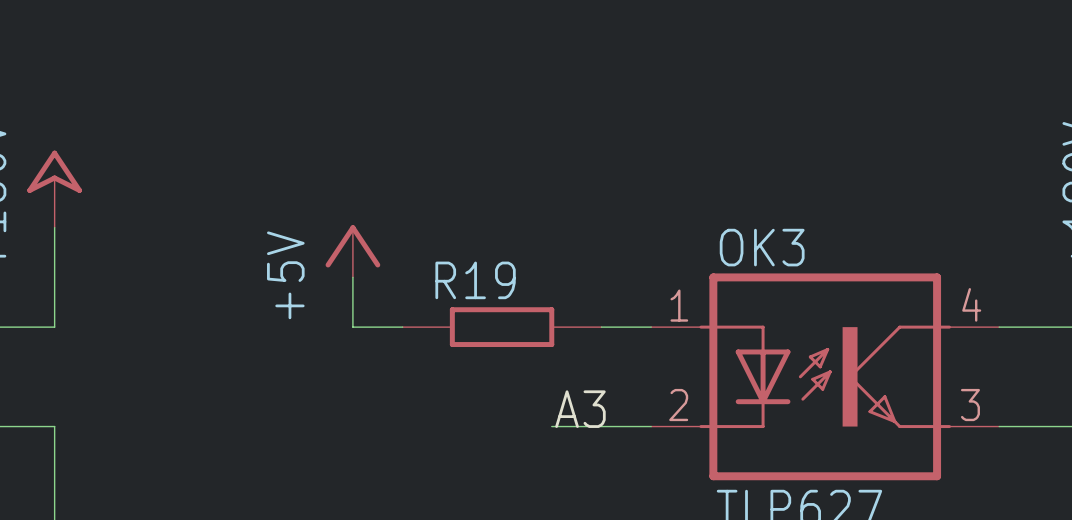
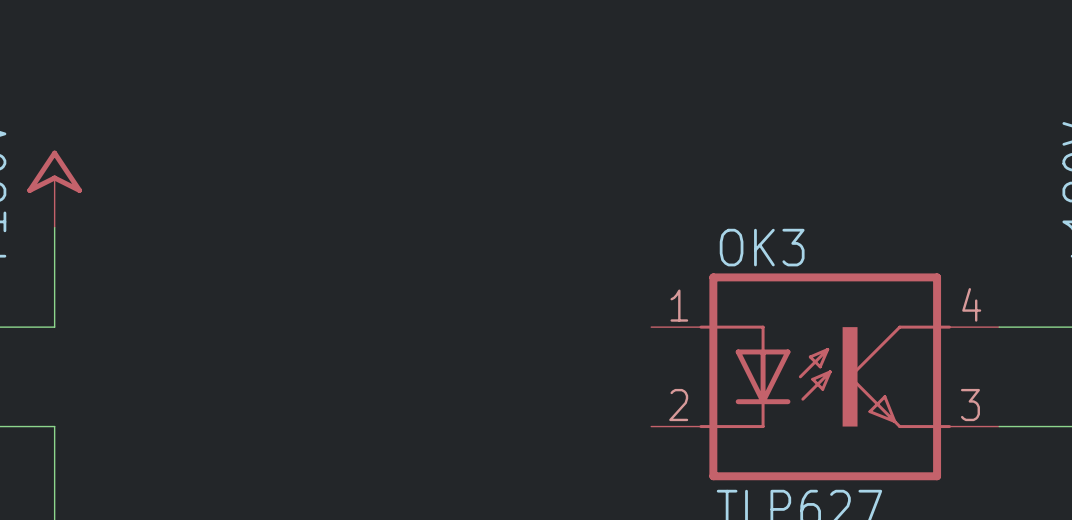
power symbol: +5V (352, 251) -> none
wire: (352, 277) (352, 327) (402, 327) -> none
R19: (502, 327) -> none
wire: (601, 327) (651, 327) -> none
label: A3 (580, 409) -> none
wire: (551, 426) (651, 426) -> none

